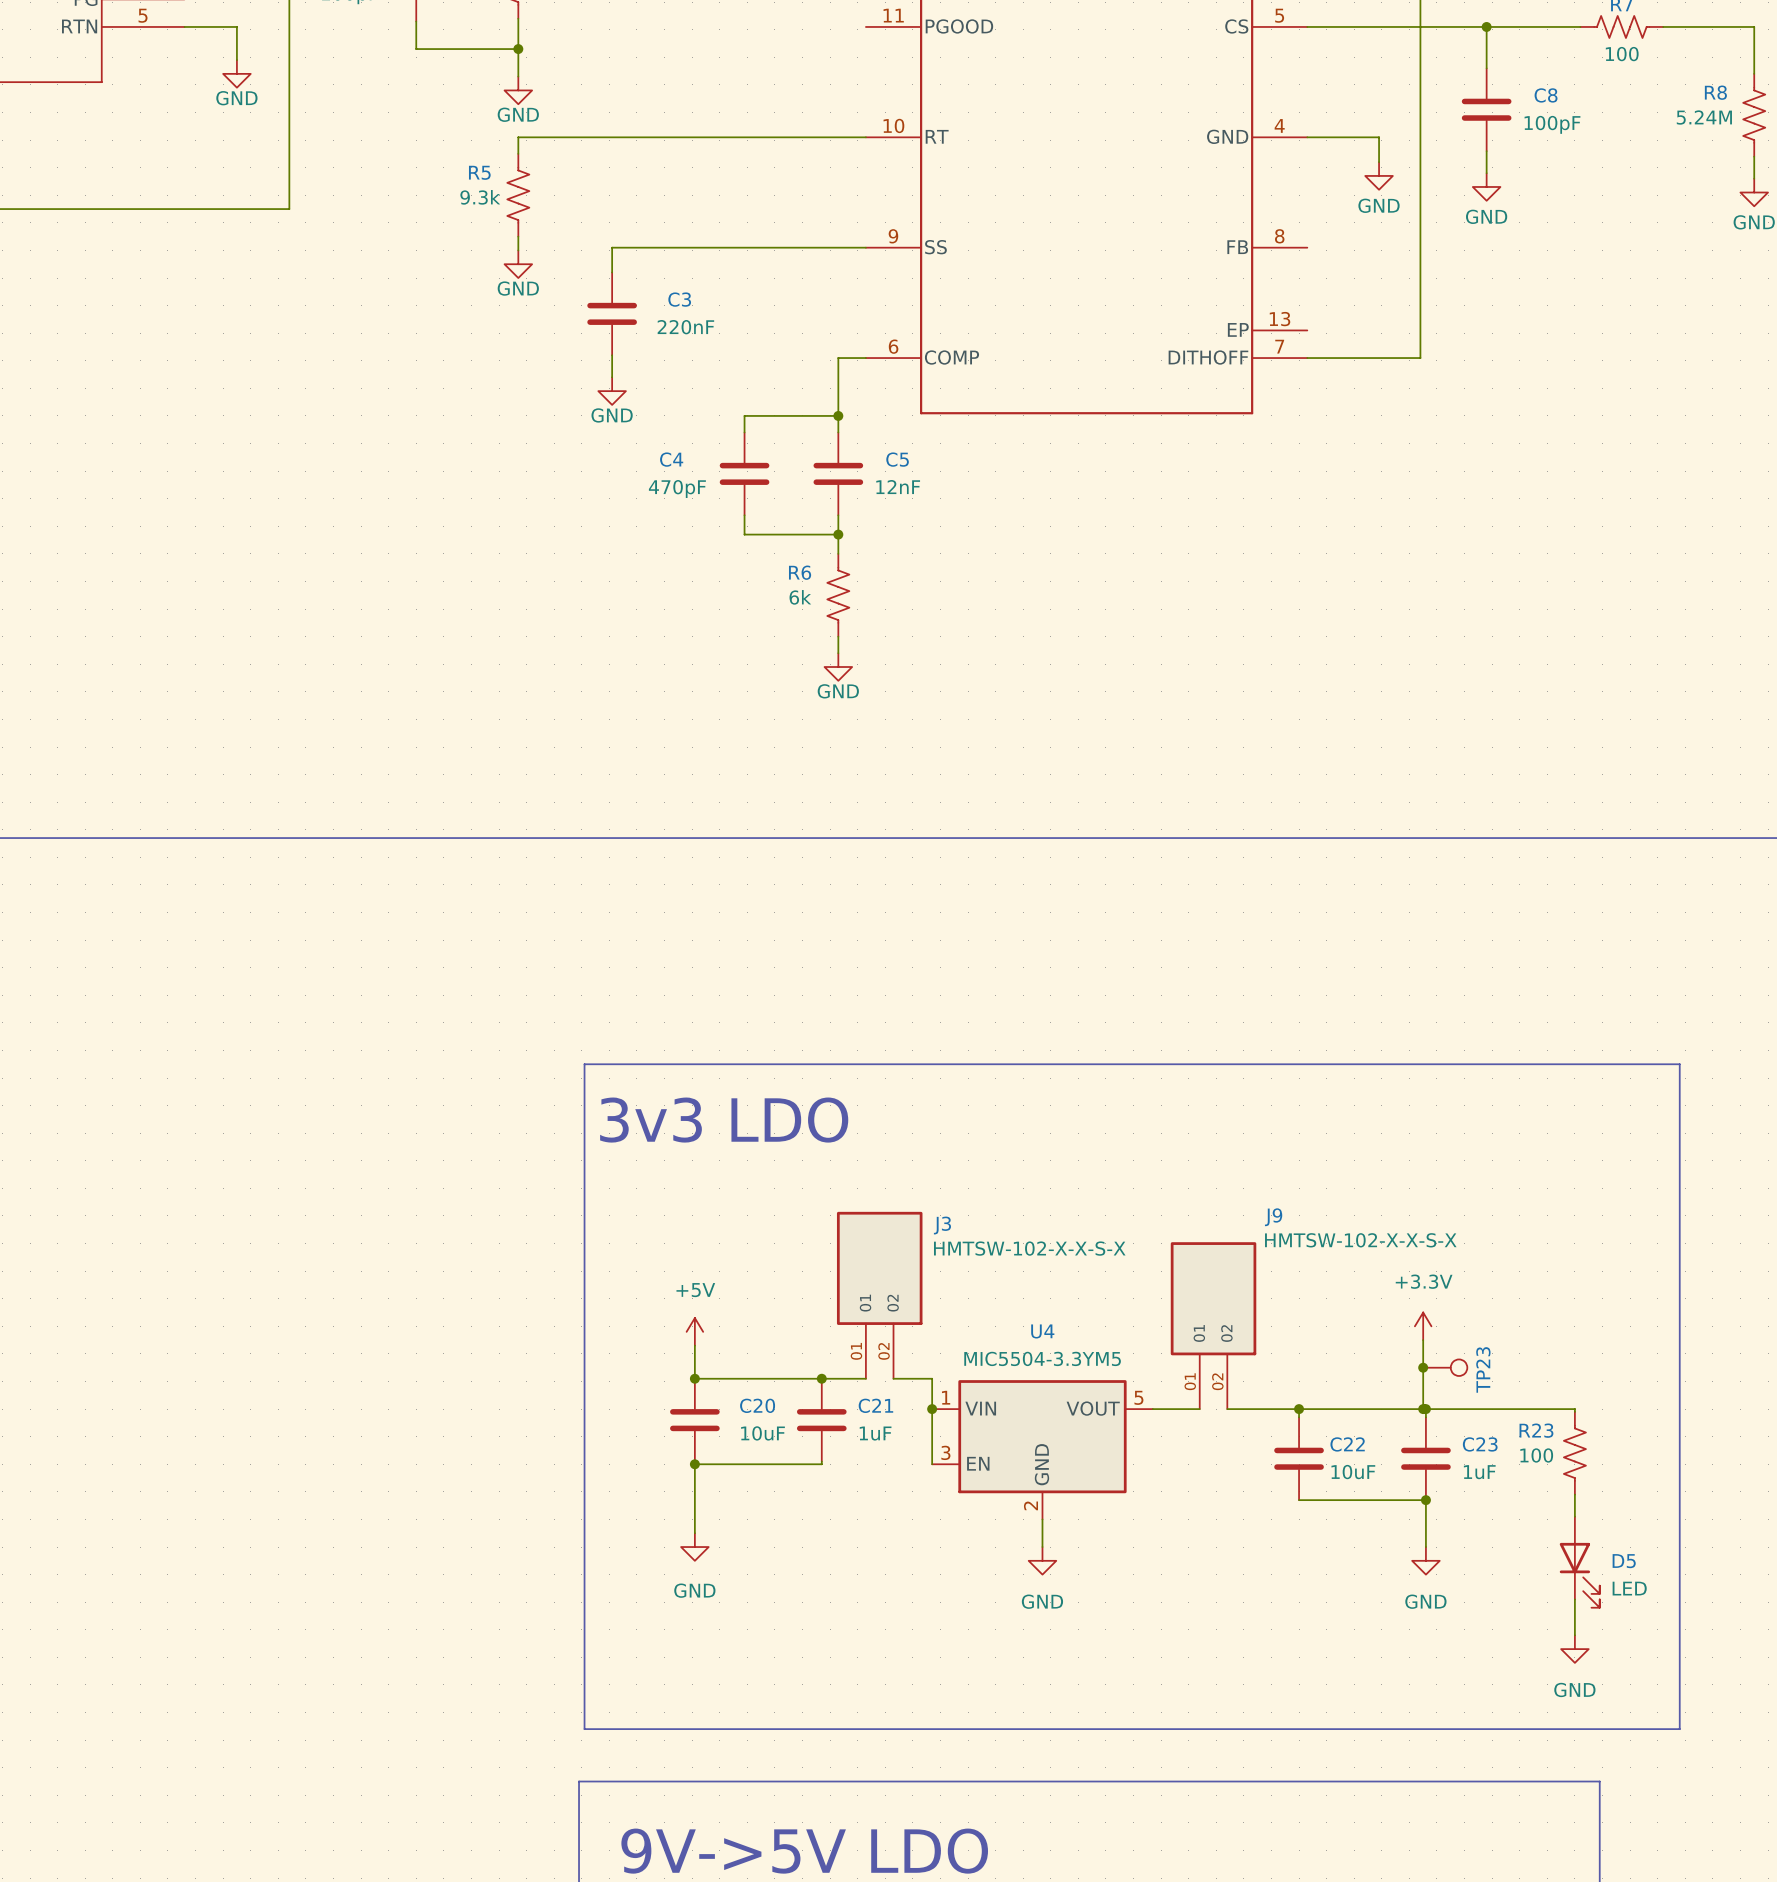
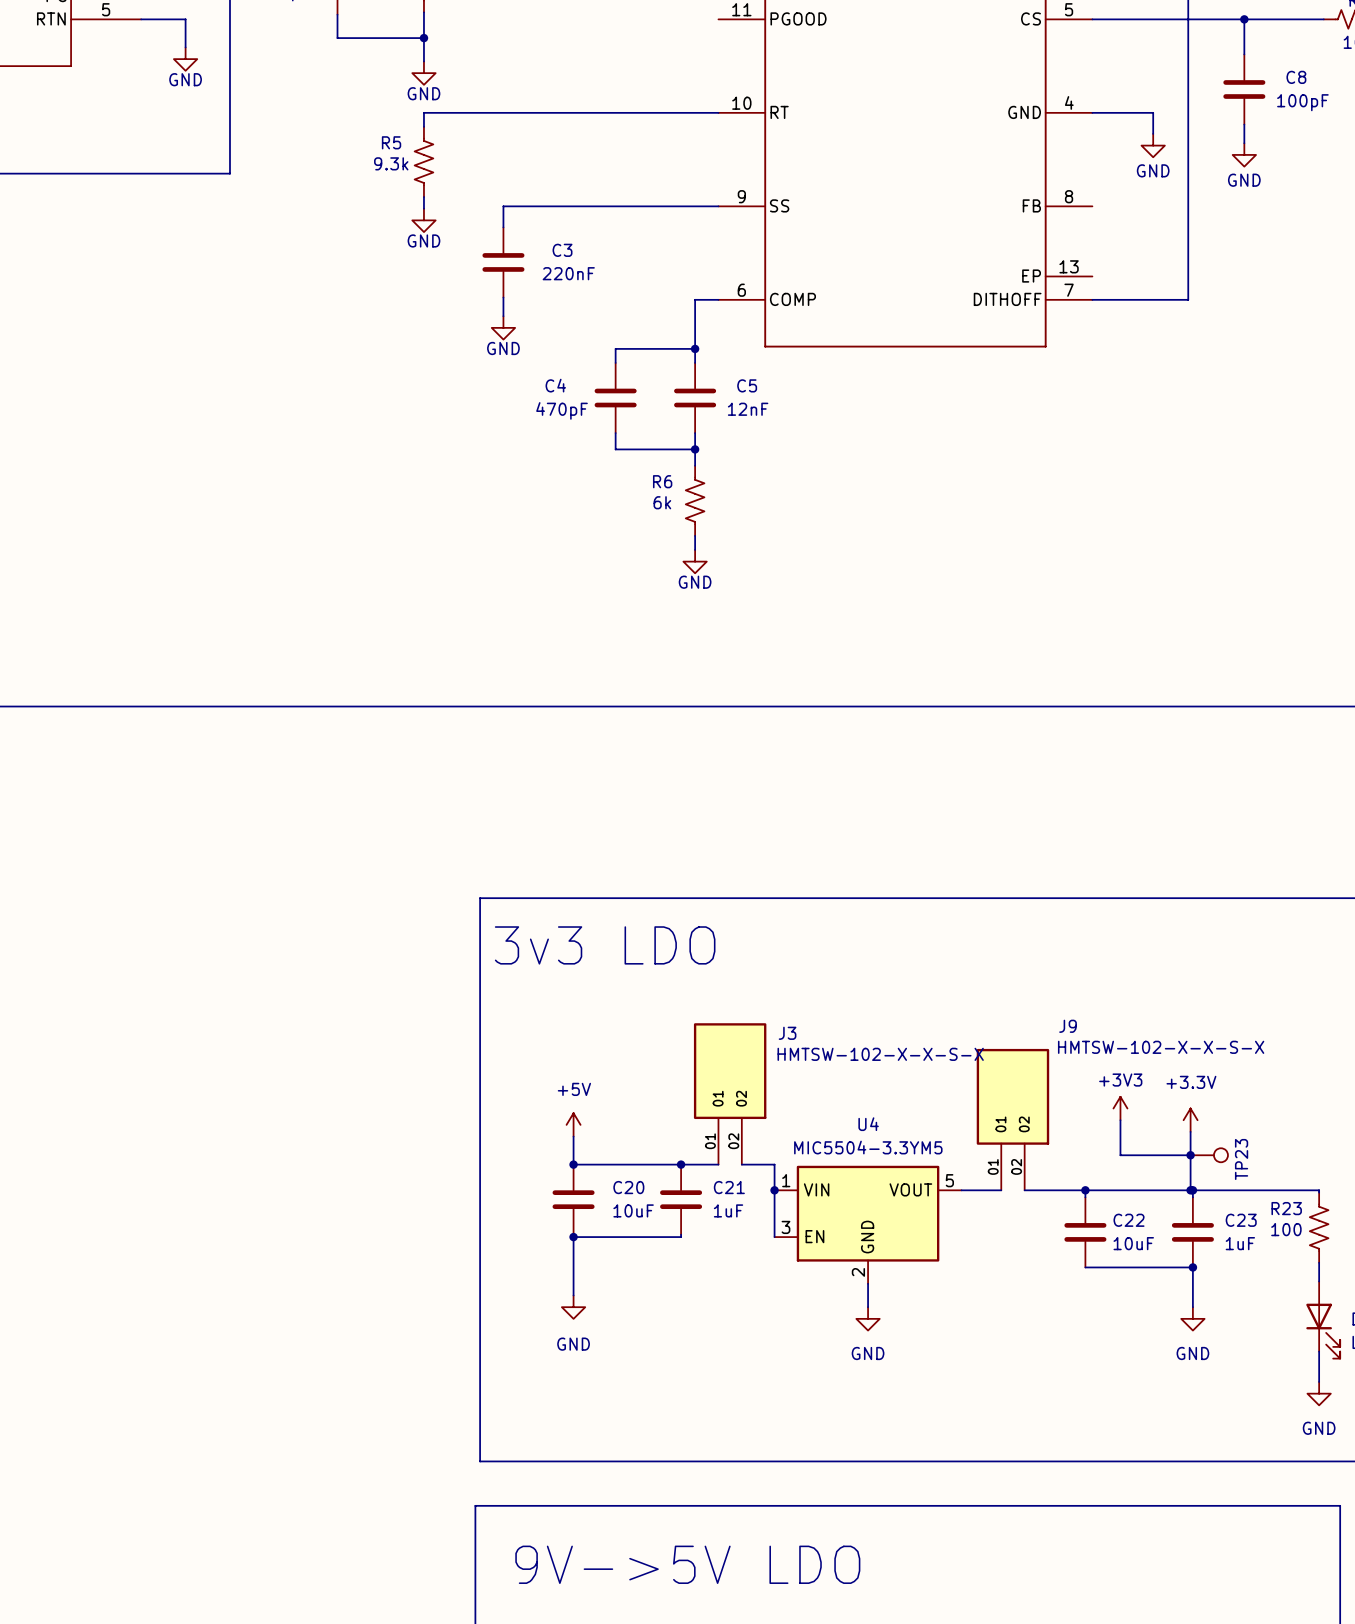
power symbol: none -> +3V3 (1120, 1108)
wire: none -> (1120, 1120) (1120, 1155) (1190, 1155)

